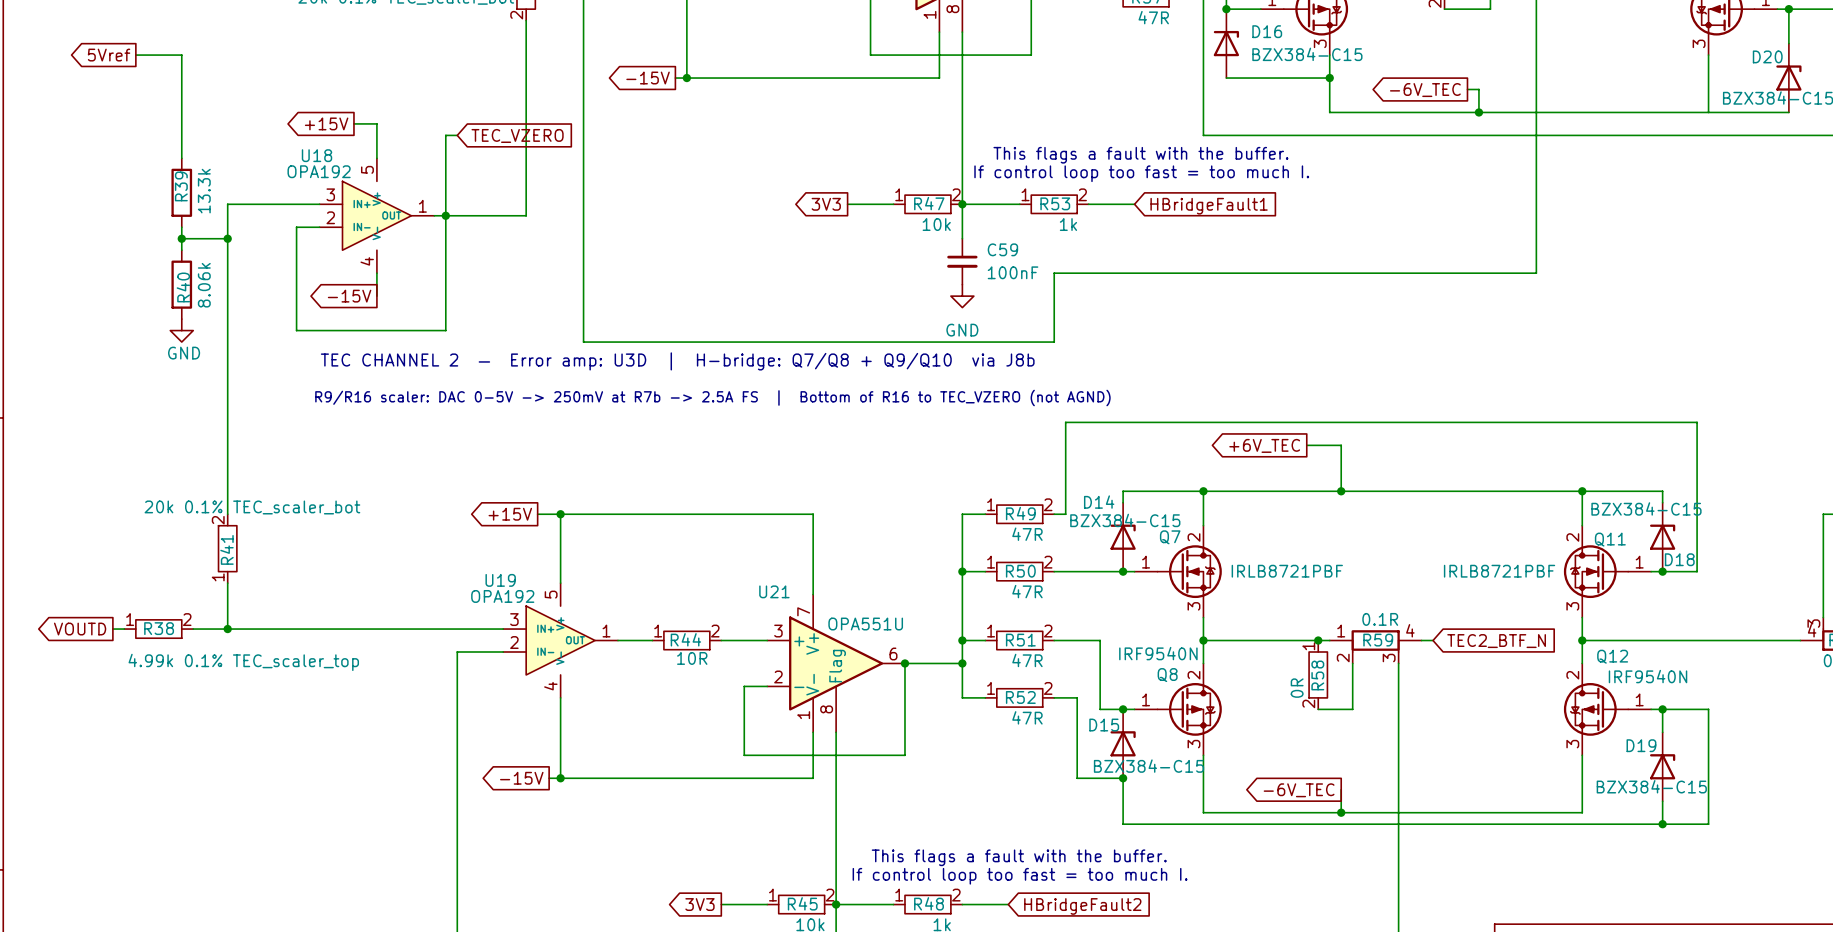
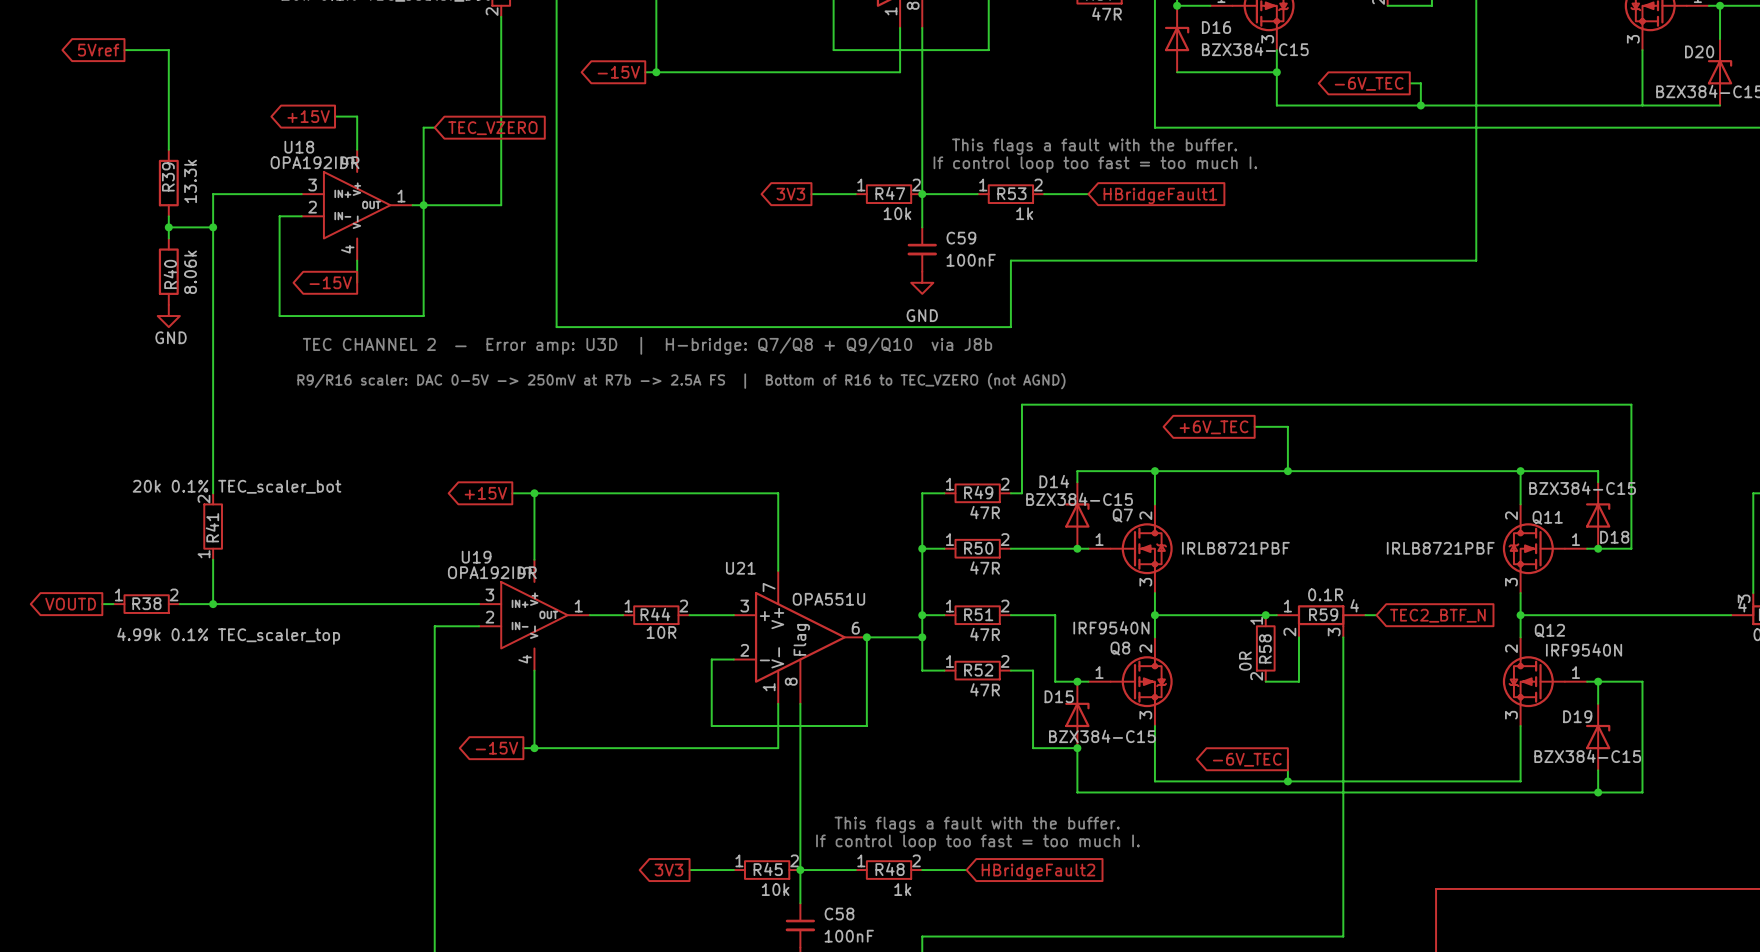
U18 value: OPA192 (319, 171) -> OPA192IDR (315, 162)
U19 value: OPA192 (502, 596) -> OPA192IDR (492, 572)

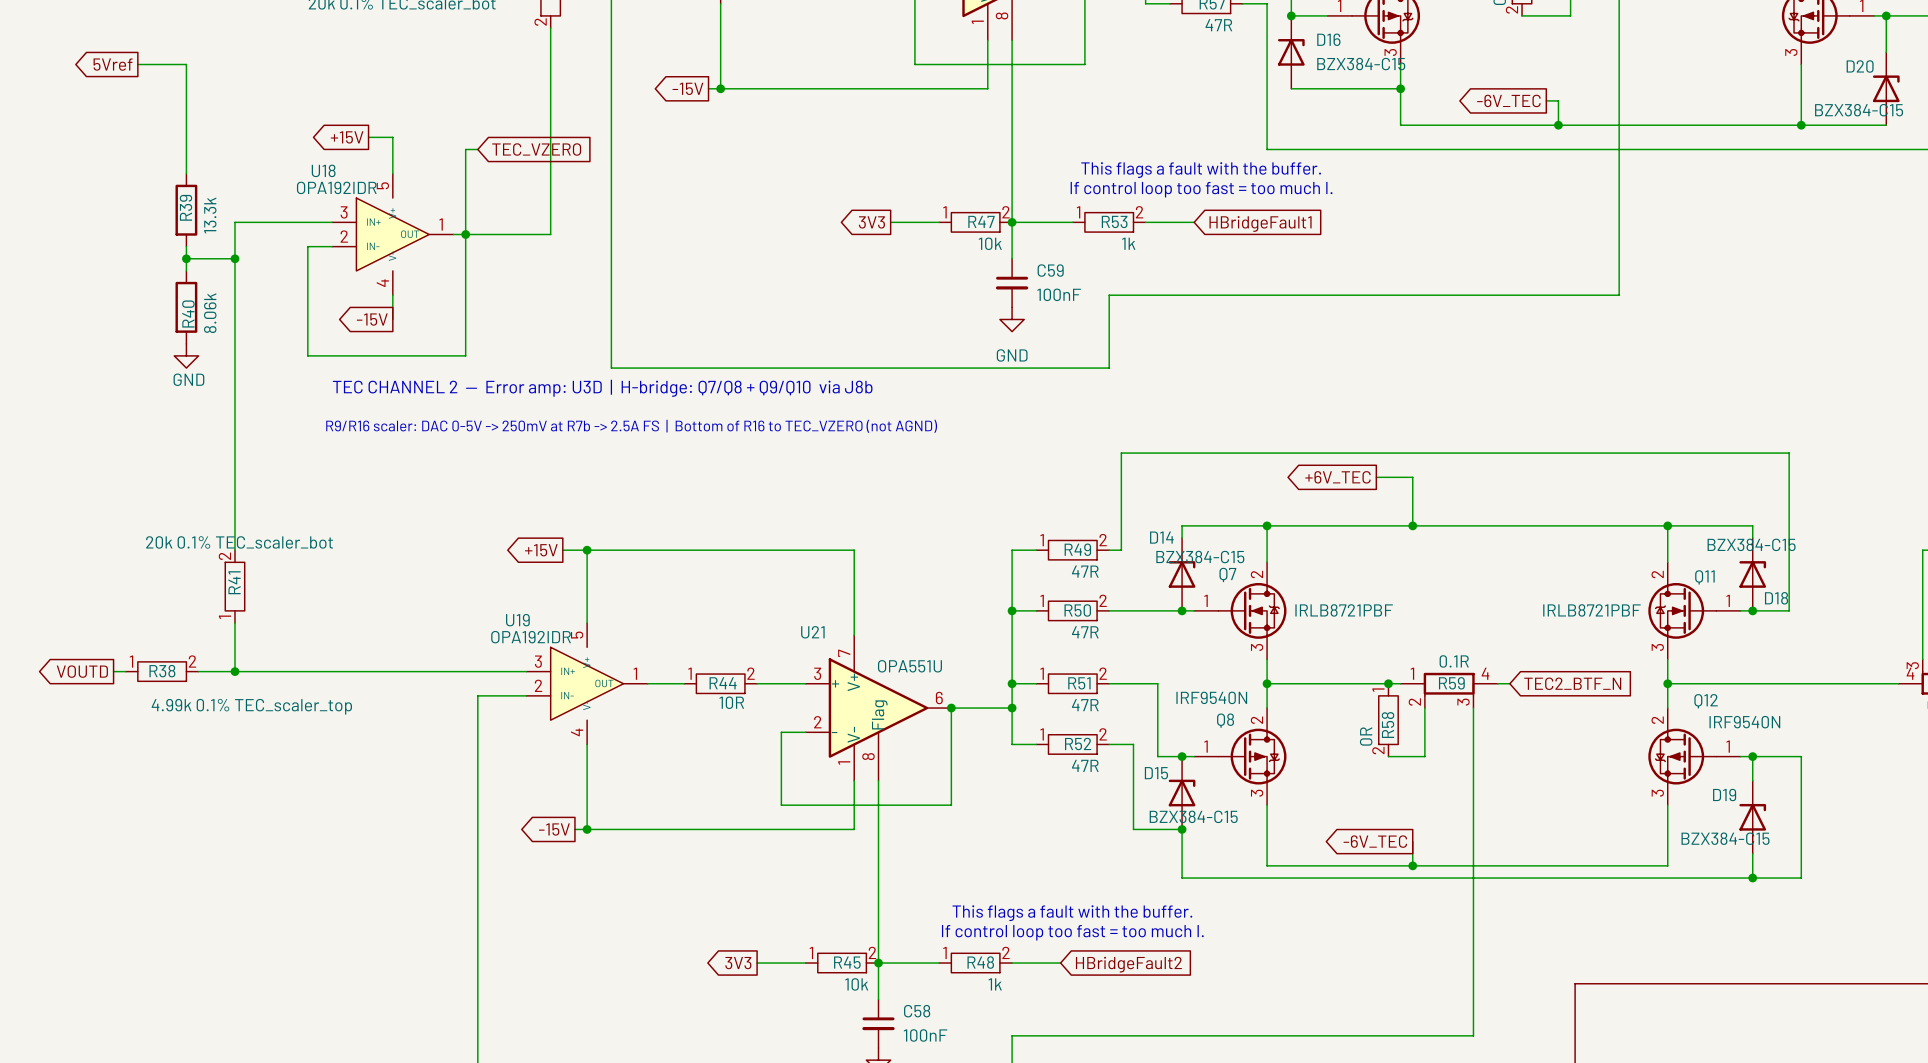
junction: none -> (1801, 125)

